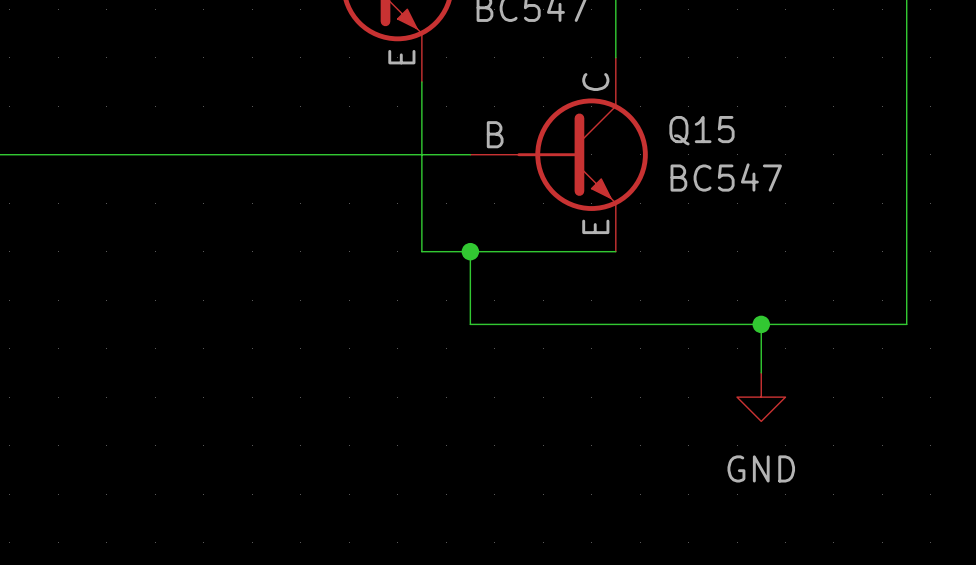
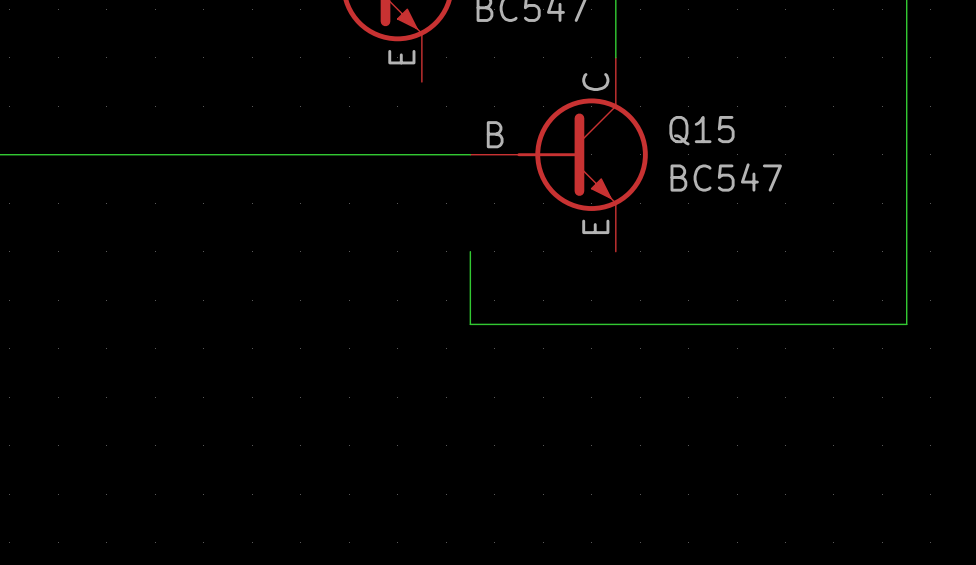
wire: (421, 81) (421, 251) (615, 251) -> none
junction: (470, 251) -> none
wire: (761, 324) (761, 372) -> none
junction: (761, 324) -> none
power symbol: GND (761, 397) -> none

